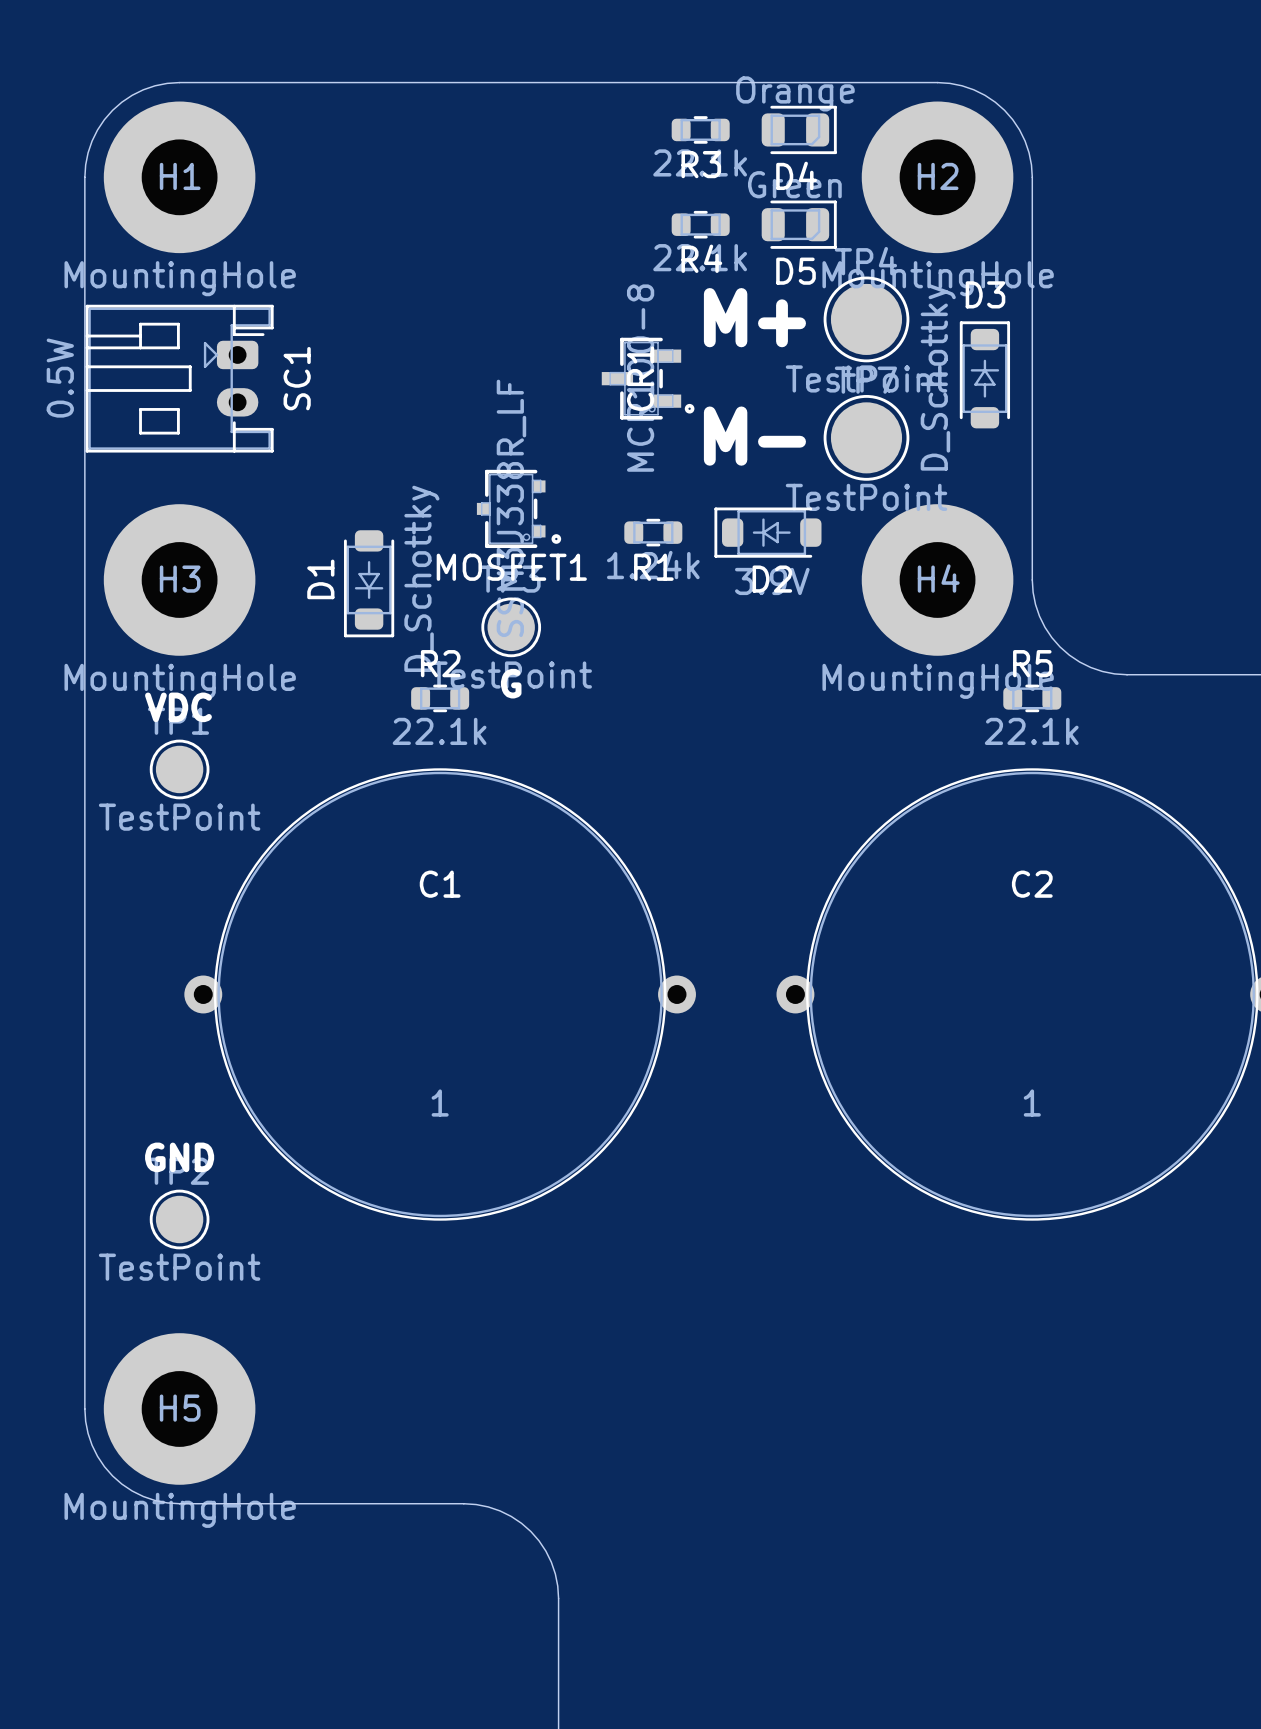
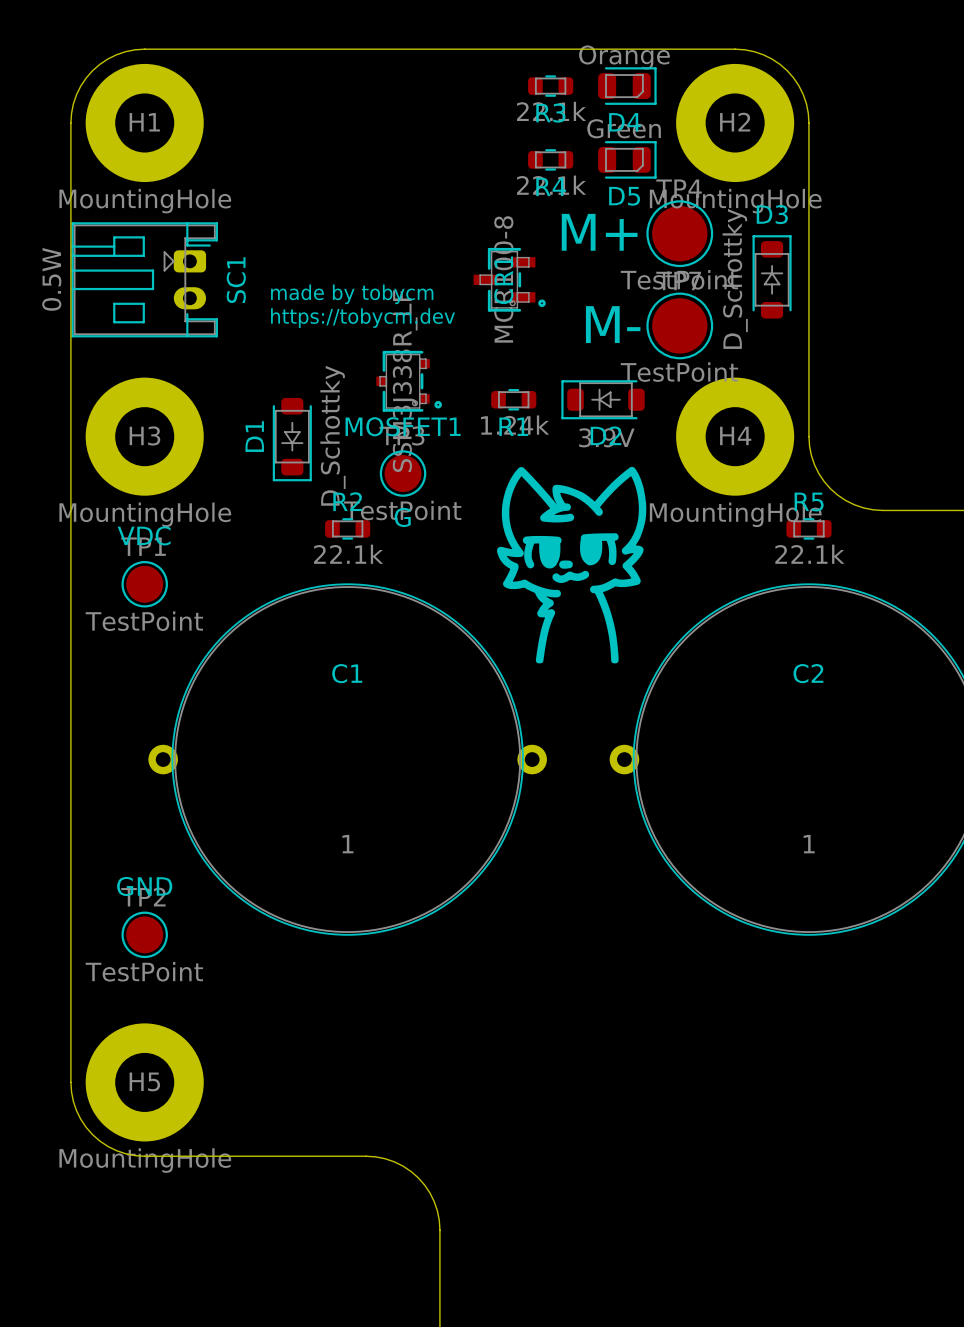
text: none -> made by tobycm (352, 294)
text: none -> https://tobycm.dev (363, 318)
drawing: none -> [497, 466, 647, 664]

